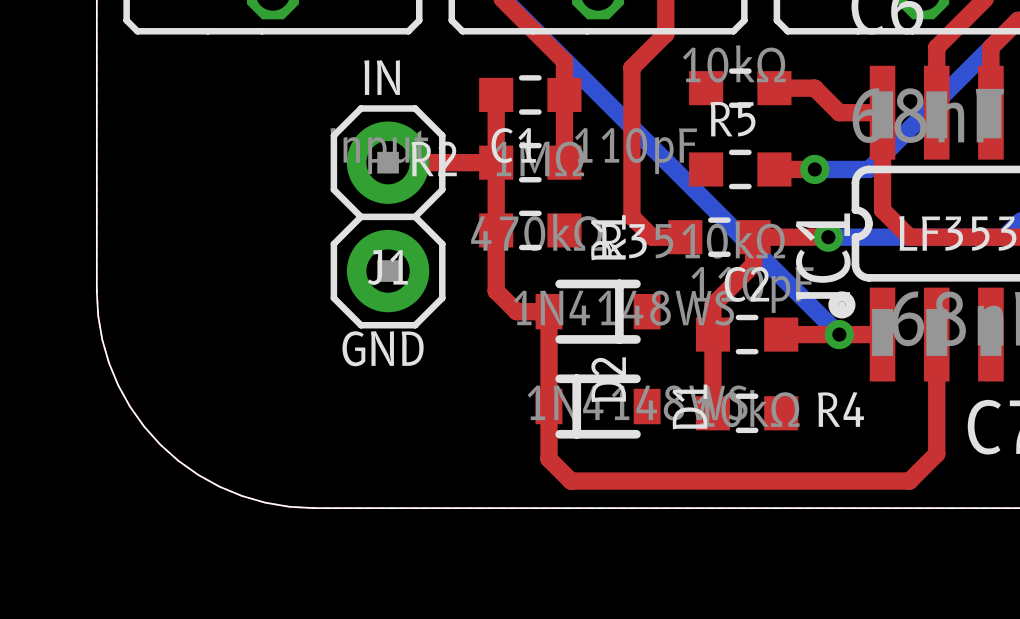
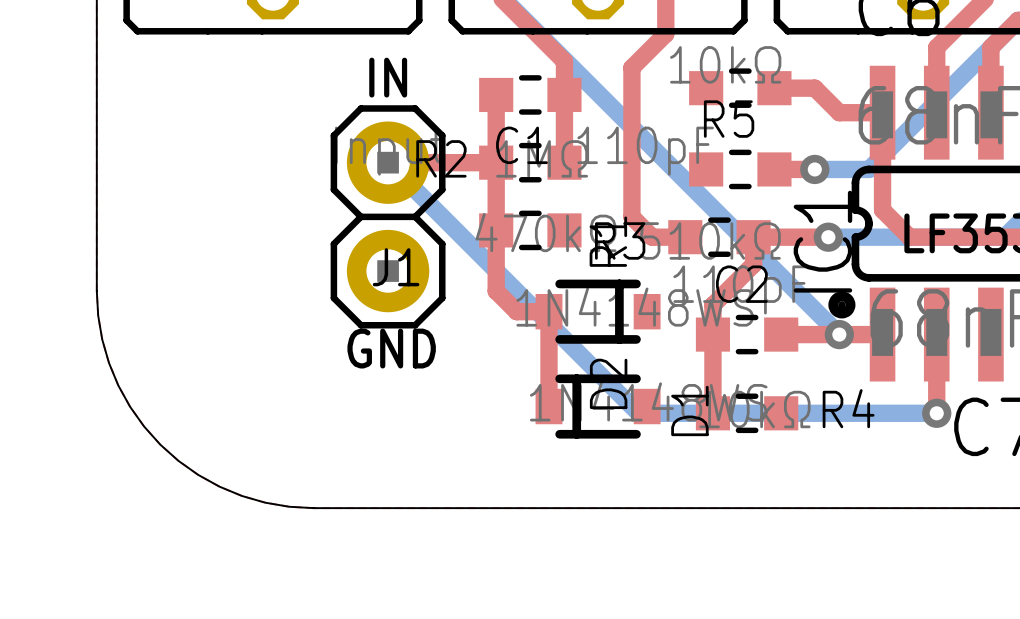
bottom track: none -> (388, 162) (638, 413) (936, 413)
top track: (549, 406) (549, 459) (570, 481) (909, 481) (936, 453) (936, 413) -> none
via: none -> (936, 413)

